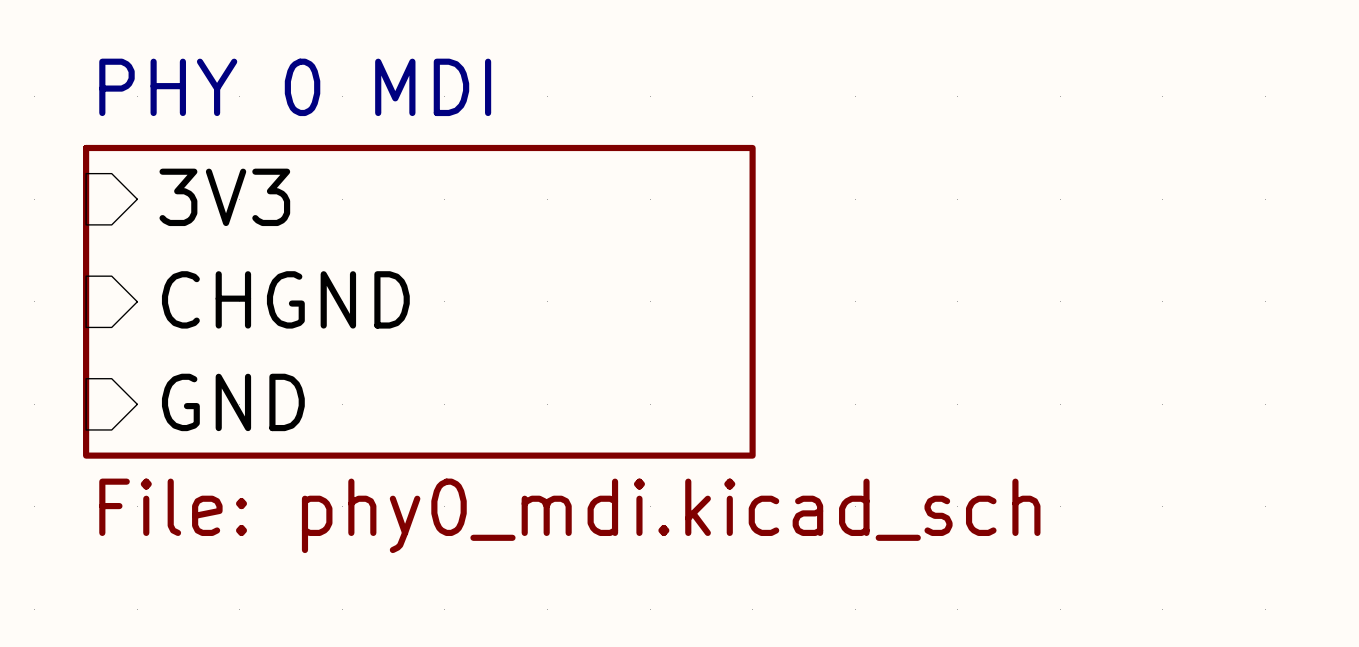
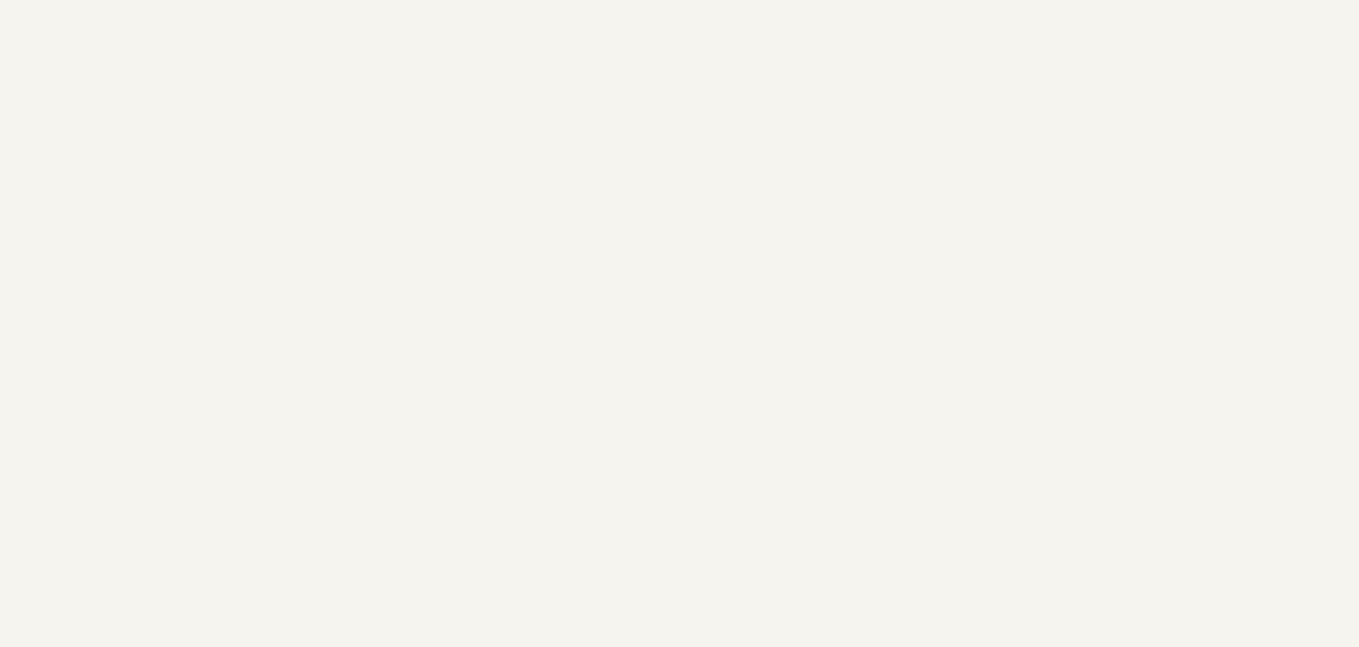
sheet pin: 3V3 (224, 197) -> none
sheet pin: CHGND (285, 299) -> none
sheet PHY 0 MDI: File: phy0_mdi.kicad_sch (419, 301) -> none
sheet pin: GND (233, 402) -> none

